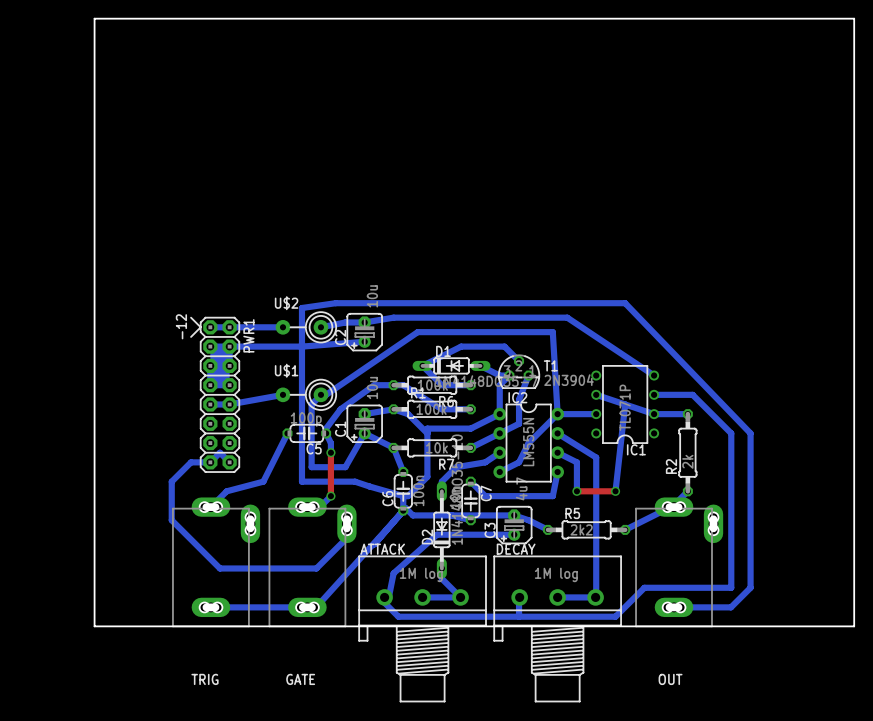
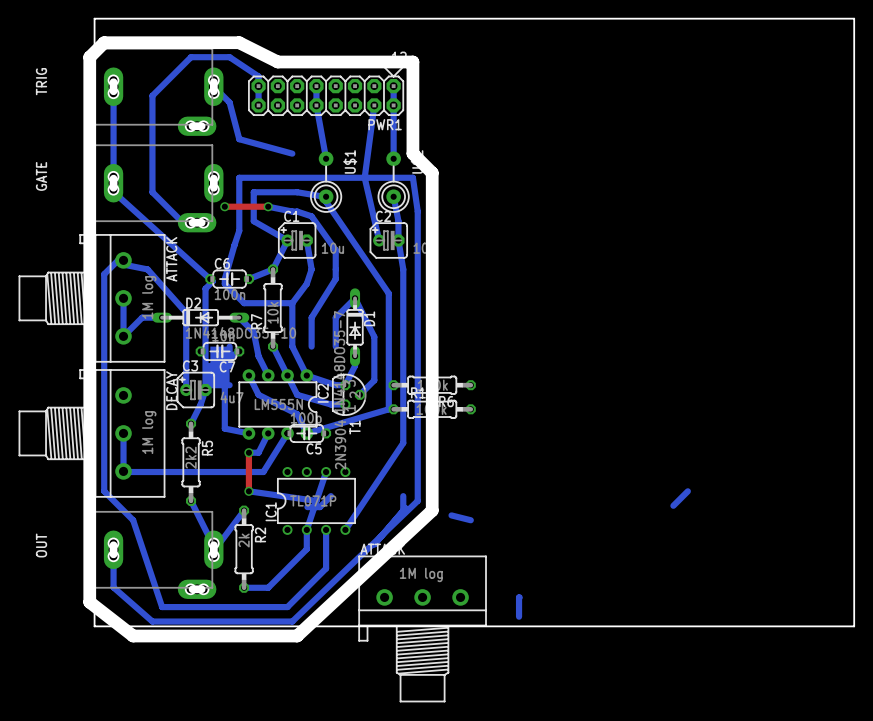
board edge: none -> (104, 42) (89, 57) (89, 602) (133, 636) (297, 636) (432, 510) (432, 172) (412, 153) (412, 62) (277, 62) (239, 42) (104, 42)
bottom track: none -> (113, 86) (113, 191) (212, 281) (205, 288) (205, 390) (191, 423)
bottom track: none -> (213, 86) (229, 102) (239, 139) (292, 153)
bottom track: none -> (316, 86) (316, 105) (326, 158)
bottom track: none -> (393, 86) (393, 158)
TRIG: none -> (158, 92)
bottom track: none -> (258, 105) (258, 76) (229, 57) (191, 57) (152, 95) (152, 192) (182, 222) (197, 222)
bottom track: none -> (374, 105) (364, 177) (379, 240)
GATE: none -> (158, 188)
bottom track: none -> (326, 196) (326, 201) (388, 293) (388, 409) (306, 433) (297, 414) (258, 394) (248, 375)
bottom track: none -> (393, 196) (398, 221) (398, 240) (403, 269) (403, 443) (345, 529)
bottom track: none -> (326, 197) (297, 192) (253, 192) (253, 221) (287, 240) (273, 269) (248, 279)
top track: none -> (224, 206) (268, 206)
via: none -> (224, 206)
bottom track: none -> (268, 206) (297, 211) (311, 216) (335, 250) (335, 279) (311, 317) (311, 346)
via: none -> (268, 206)
bottom track: none -> (306, 240) (311, 269) (306, 283) (292, 303)
bottom track: none -> (123, 264) (118, 259) (104, 274) (104, 491) (133, 520) (162, 607) (287, 607) (326, 568) (326, 529)
bottom track: none -> (123, 264) (147, 269) (186, 312) (186, 390)
ATTACK: none -> 1M log (91, 298)
bottom track: none -> (123, 298) (123, 336) (142, 317) (162, 317)
bottom track: none -> (292, 303) (244, 303) (224, 283) (239, 230) (239, 177) (412, 177) (417, 211) (417, 500) (292, 621) (152, 621) (113, 587) (113, 549)
bottom track: none -> (292, 303) (292, 346) (306, 375) (335, 385) (345, 385) (355, 365) (355, 356)
bottom track: none -> (239, 317) (253, 332) (258, 356) (268, 375)
bottom track: (210, 327) (282, 327) -> none
U$2 rotation: 0° (306, 327) -> 90° clockwise (393, 181)
U$2 position: (306, 327) -> (393, 181)
bottom track: (320, 327) (345, 322) (364, 322) (393, 317) (567, 317) (654, 375) -> none
C2 rotation: 0° (364, 332) -> 90° clockwise (388, 240)
C2 position: (364, 332) -> (388, 240)
bottom track: (364, 341) (301, 346) (210, 346) -> none
bottom track: none -> (273, 346) (297, 394) (330, 404) (345, 404)
bottom track: none -> (335, 346) (335, 317) (355, 298) (374, 336) (374, 380) (359, 394)
bottom track: none -> (239, 351) (224, 361) (224, 428) (248, 433)
T1 footprint: [498, 354, 540, 389] -> [332, 374, 367, 416]
bottom track: (519, 361) (504, 346) (461, 346) (422, 365) (441, 385) (470, 385) -> none
D1 rotation: 0° (451, 365) -> 90° clockwise (355, 327)
D1 position: (451, 365) -> (355, 327)
bottom track: (480, 365) (499, 375) (509, 375) (499, 385) (499, 414) (470, 428) (427, 428) (427, 476) (408, 496) (355, 481) (301, 481) (301, 308) (335, 303) (625, 303) (750, 433) (750, 587) (730, 607) (674, 607) -> none
T1 name position: T1 (550, 365) -> T1 (355, 427)
bottom track: (528, 375) (519, 399) (519, 423) (470, 447) -> none
T1 value position: 2N3904 (569, 380) -> 2N3904 (340, 444)
PWR1 rotation: 0° (215, 394) -> 90° clockwise (326, 91)
PWR1 position: (215, 394) -> (326, 91)
bottom track: (282, 394) (229, 404) (210, 404) -> none
U$1 rotation: 0° (306, 394) -> 90° clockwise (326, 181)
U$1 position: (306, 394) -> (326, 181)
bottom track: (320, 394) (326, 394) (417, 332) (552, 332) (557, 414) -> none
bottom track: (321, 394) (311, 404) (311, 467) (345, 467) (364, 433) (393, 447) (403, 472) -> none
bottom track: (596, 394) (654, 414) (687, 414) -> none
bottom track: (654, 394) (692, 394) (731, 433) (731, 587) (644, 587) (615, 616) (398, 616) (383, 602) (388, 597) -> none
bottom track: (625, 404) (615, 491) -> none
IC1 rotation: 0° (625, 404) -> 90° clockwise (316, 500)
IC1 position: (625, 404) -> (316, 500)
bottom track: (470, 409) (441, 409) (403, 385) (374, 385) (340, 409) (326, 428) (326, 433) (330, 443) (330, 452) -> none
bottom track: (364, 414) (393, 409) (408, 414) (427, 433) -> none
bottom track: (557, 414) (596, 414) -> none
bottom track: (557, 414) (528, 443) (519, 462) (499, 472) -> none
C1 rotation: 0° (364, 423) -> 90° clockwise (297, 240)
C1 position: (364, 423) -> (297, 240)
DECAY: none -> 1M log (91, 433)
bottom track: none -> (268, 433) (258, 452) (248, 452)
bottom track: (287, 433) (263, 481) (226, 491) (210, 507) -> (287, 433) (263, 472) (123, 472) (123, 433)
bottom track: (557, 433) (596, 457) (596, 597) (557, 597) -> none
IC2 rotation: 0° (528, 443) -> 90° clockwise (277, 404)
IC2 position: (528, 443) -> (277, 404)
R7 rotation: 0° (432, 447) -> 90° clockwise (273, 308)
R7 position: (432, 447) -> (273, 308)
top track: none -> (248, 452) (248, 491)
via: none -> (248, 452)
top track: (330, 452) (330, 496) -> none
via: (330, 452) -> none
bottom track: (499, 452) (485, 462) (456, 467) (441, 481) (441, 491) -> none
bottom track: (557, 452) (576, 462) (576, 491) -> none
R2 position: (687, 452) -> (244, 549)
R2 value position: 2k (687, 461) -> 2k (244, 540)
bottom track: (229, 462) (219, 452) (210, 462) (191, 462) (171, 481) (171, 520) (219, 568) (316, 568) (346, 538) (346, 523) -> none
R2 name position: R2 (671, 466) -> R2 (260, 534)
bottom track: none -> (326, 472) (306, 529) (306, 549) (268, 587) (244, 587)
bottom track: (557, 472) (552, 496) (485, 496) (470, 481) -> none
bottom track: none -> (248, 491) (316, 500)
via: none -> (248, 491)
C6 rotation: 0° (403, 491) -> 90° clockwise (229, 279)
C6 position: (403, 491) -> (229, 279)
top track: (576, 491) (615, 491) -> none
via: (576, 491) -> none
via: (615, 491) -> none
via: (330, 496) -> none
bottom track: none -> (191, 500) (215, 549)
C7 rotation: 0° (470, 500) -> 90° clockwise (219, 351)
C7 position: (470, 500) -> (219, 351)
bottom track: (674, 507) (625, 529) -> none
bottom track: none -> (244, 510) (215, 549)
C3 rotation: 0° (514, 525) -> 90° clockwise (195, 390)
C3 position: (514, 525) -> (195, 390)
D2 rotation: 0° (441, 529) -> 90° clockwise (200, 317)
D2 position: (441, 529) -> (200, 317)
bottom track: (547, 529) (514, 515) (412, 515) (405, 508) (316, 607) (210, 607) -> none
R5 rotation: 0° (586, 529) -> 90° clockwise (191, 462)
R5 position: (586, 529) -> (191, 462)
bottom track: (514, 534) (437, 534) (393, 573) (388, 597) -> none
OUT: none -> (158, 555)
TRIG: (216, 562) -> none
GATE: (312, 562) -> none
OUT: (679, 562) -> none
bottom track: (441, 568) (441, 578) (460, 597) (422, 597) -> none
DECAY: 1M log (557, 628) -> none

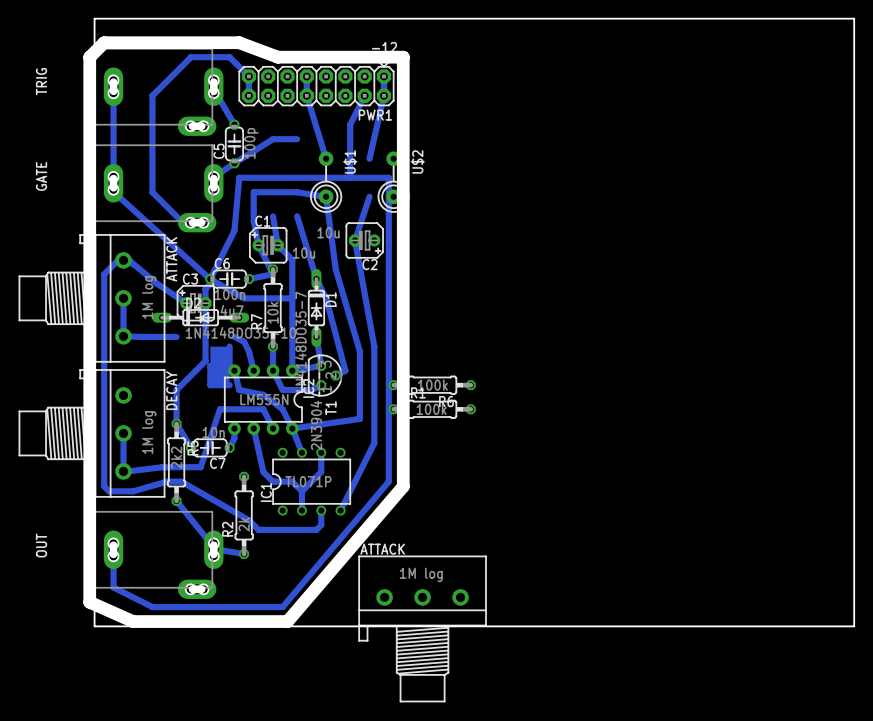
board edge: (239, 42) (277, 62) (412, 62) (412, 153) (432, 172) (432, 510) (297, 636) (133, 636) (89, 602) -> (239, 42) (277, 57) (403, 57) (403, 486) (287, 621) (133, 621) (89, 602)
bottom track: (229, 57) (258, 76) (258, 105) -> (229, 57) (248, 76) (248, 95)
bottom track: none -> (383, 76) (383, 95) (369, 158)
bottom track: (213, 86) (229, 102) (239, 139) (292, 153) -> (213, 86) (210, 83) (234, 124)
bottom track: (316, 86) (316, 105) (326, 158) -> (306, 76) (306, 95) (326, 158)
bottom track: (393, 86) (393, 158) -> none
PWR1 position: (326, 91) -> (316, 81)
bottom track: none -> (364, 95) (350, 124) (350, 177)
bottom track: (374, 105) (364, 177) (379, 240) -> none
bottom track: none -> (297, 139) (273, 139) (219, 172) (219, 183) (213, 183)
bottom track: (239, 177) (239, 230) (224, 283) (244, 303) (292, 303) (306, 283) (311, 269) (306, 240) -> (239, 177) (234, 230) (210, 279) (244, 298) (292, 298)
bottom track: (388, 177) (412, 177) (417, 211) (417, 500) (292, 621) (152, 621) (113, 587) -> none
bottom track: none -> (326, 196) (335, 269) (359, 351) (359, 418) (292, 428)
bottom track: (393, 196) (398, 221) (398, 240) (403, 269) (403, 443) (345, 529) -> none
bottom track: (326, 197) (326, 201) (388, 293) -> (388, 177) (388, 293)
top track: (224, 206) (268, 206) -> none
via: (224, 206) -> none
bottom track: (268, 206) (297, 211) (311, 216) (335, 250) (335, 279) (311, 317) (311, 346) -> none
via: (268, 206) -> none
bottom track: none -> (273, 216) (277, 245) (292, 259) (292, 303)
bottom track: none -> (297, 216) (316, 279) (326, 298) (345, 370) (335, 375)
bottom track: (253, 221) (287, 240) (273, 269) (248, 279) -> (253, 221) (258, 245) (273, 274) (248, 279)
C1 position: (297, 240) -> (268, 245)
C2 rotation: 0° (388, 240) -> 180° (364, 240)
C2 position: (388, 240) -> (364, 240)
bottom track: (123, 264) (147, 269) (186, 312) (186, 390) -> none
bottom track: none -> (133, 264) (128, 259) (157, 283) (186, 303)
bottom track: (162, 317) (142, 317) (123, 336) -> (176, 336) (123, 336)
bottom track: (239, 317) (253, 332) (258, 356) (268, 375) -> none
D1 position: (355, 327) -> (316, 308)
bottom track: none -> (234, 336) (244, 341) (248, 351) (253, 370)
bottom track: (273, 346) (297, 394) (330, 404) (345, 404) -> none
bottom track: (292, 346) (306, 375) (335, 385) (345, 385) (355, 365) (355, 356) -> (292, 346) (292, 370) (321, 365) (316, 336)
bottom track: (335, 346) (335, 317) (355, 298) (374, 336) (374, 346) -> (369, 196) (355, 240) (374, 346)
C7 position: (219, 351) -> (210, 447)
bottom track: (239, 351) (224, 361) (224, 428) (248, 433) -> none
bottom track: none -> (273, 351) (273, 370) (282, 390) (311, 390) (321, 385)
bottom track: (205, 361) (205, 390) (191, 423) -> (205, 361) (176, 390) (176, 423) (191, 447)
bottom track: none -> (234, 370) (239, 390) (263, 394) (282, 409) (292, 428)
bottom track: (248, 375) (258, 394) (297, 414) (306, 433) (388, 409) -> none
bottom track: (374, 380) (359, 394) -> (374, 380) (374, 443) (340, 510)
C3 position: (195, 390) -> (195, 303)
T1 position: (349, 394) -> (325, 375)
IC2 position: (277, 404) -> (263, 399)
bottom track: none -> (234, 428) (234, 438) (229, 447)
bottom track: none -> (253, 428) (263, 472) (273, 481) (292, 481) (301, 491)
bottom track: none -> (292, 428) (301, 452)
bottom track: (268, 433) (258, 452) (248, 452) -> none
bottom track: (287, 433) (263, 472) (123, 472) -> (273, 428) (263, 409) (219, 409) (200, 467) (162, 467) (123, 472)
C5 rotation: 0° (306, 433) -> 90° clockwise (234, 144)
C5 position: (306, 433) -> (234, 144)
top track: (248, 452) (248, 491) -> none
via: (248, 452) -> none
bottom track: none -> (321, 452) (321, 472) (301, 491)
R5 position: (191, 462) -> (176, 462)
bottom track: (326, 472) (306, 529) (306, 549) (268, 587) (244, 587) -> none
bottom track: (104, 486) (104, 491) (133, 520) (162, 607) -> (113, 587) (152, 607) (162, 607)
bottom track: none -> (104, 486) (109, 491) (133, 491) (166, 481) (181, 481) (248, 520) (258, 529) (316, 529) (321, 525) (321, 510)
bottom track: (248, 491) (316, 500) -> none
via: (248, 491) -> none
bottom track: none -> (301, 491) (301, 510)
bottom track: (687, 491) (673, 505) -> none
bottom track: (330, 496) (319, 507) (307, 507) -> none
bottom track: (403, 496) (403, 510) (374, 544) (405, 508) -> none
bottom track: none -> (176, 500) (215, 549) (244, 554)
bottom track: (191, 500) (215, 549) (244, 510) -> none
IC1 position: (316, 500) -> (311, 481)
bottom track: (451, 515) (470, 520) -> none
bottom track: (326, 529) (326, 568) (287, 607) (282, 607) -> (388, 409) (388, 481) (282, 607)
R2 name position: R2 (260, 534) -> R2 (227, 529)
R2 value position: 2k (244, 540) -> 2k (244, 524)
R2 position: (244, 549) -> (244, 515)
bottom track: (519, 597) (519, 616) -> none

